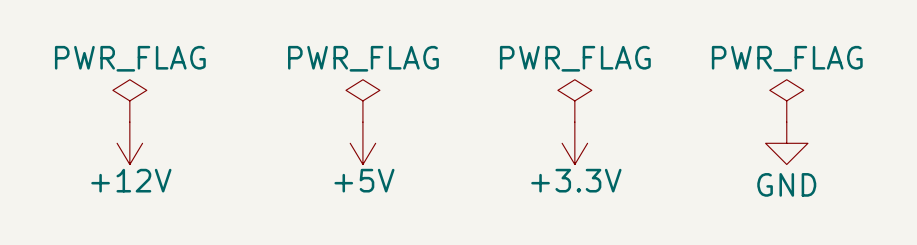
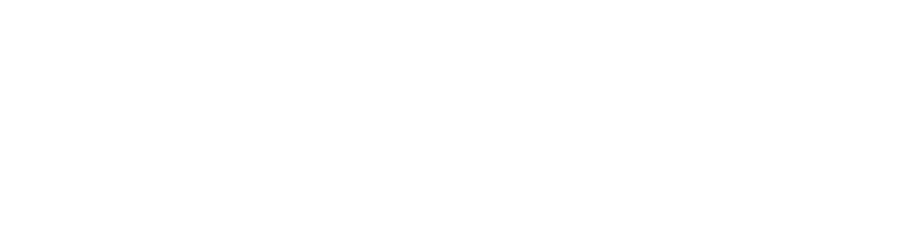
power symbol: PWR_FLAG (129, 100) -> none
power symbol: PWR_FLAG (362, 100) -> none
power symbol: PWR_FLAG (574, 100) -> none
power symbol: PWR_FLAG (786, 100) -> none
power symbol: +12V (129, 143) -> none
power symbol: +5V (362, 143) -> none
power symbol: +3.3V (574, 143) -> none
power symbol: GND (786, 143) -> none

